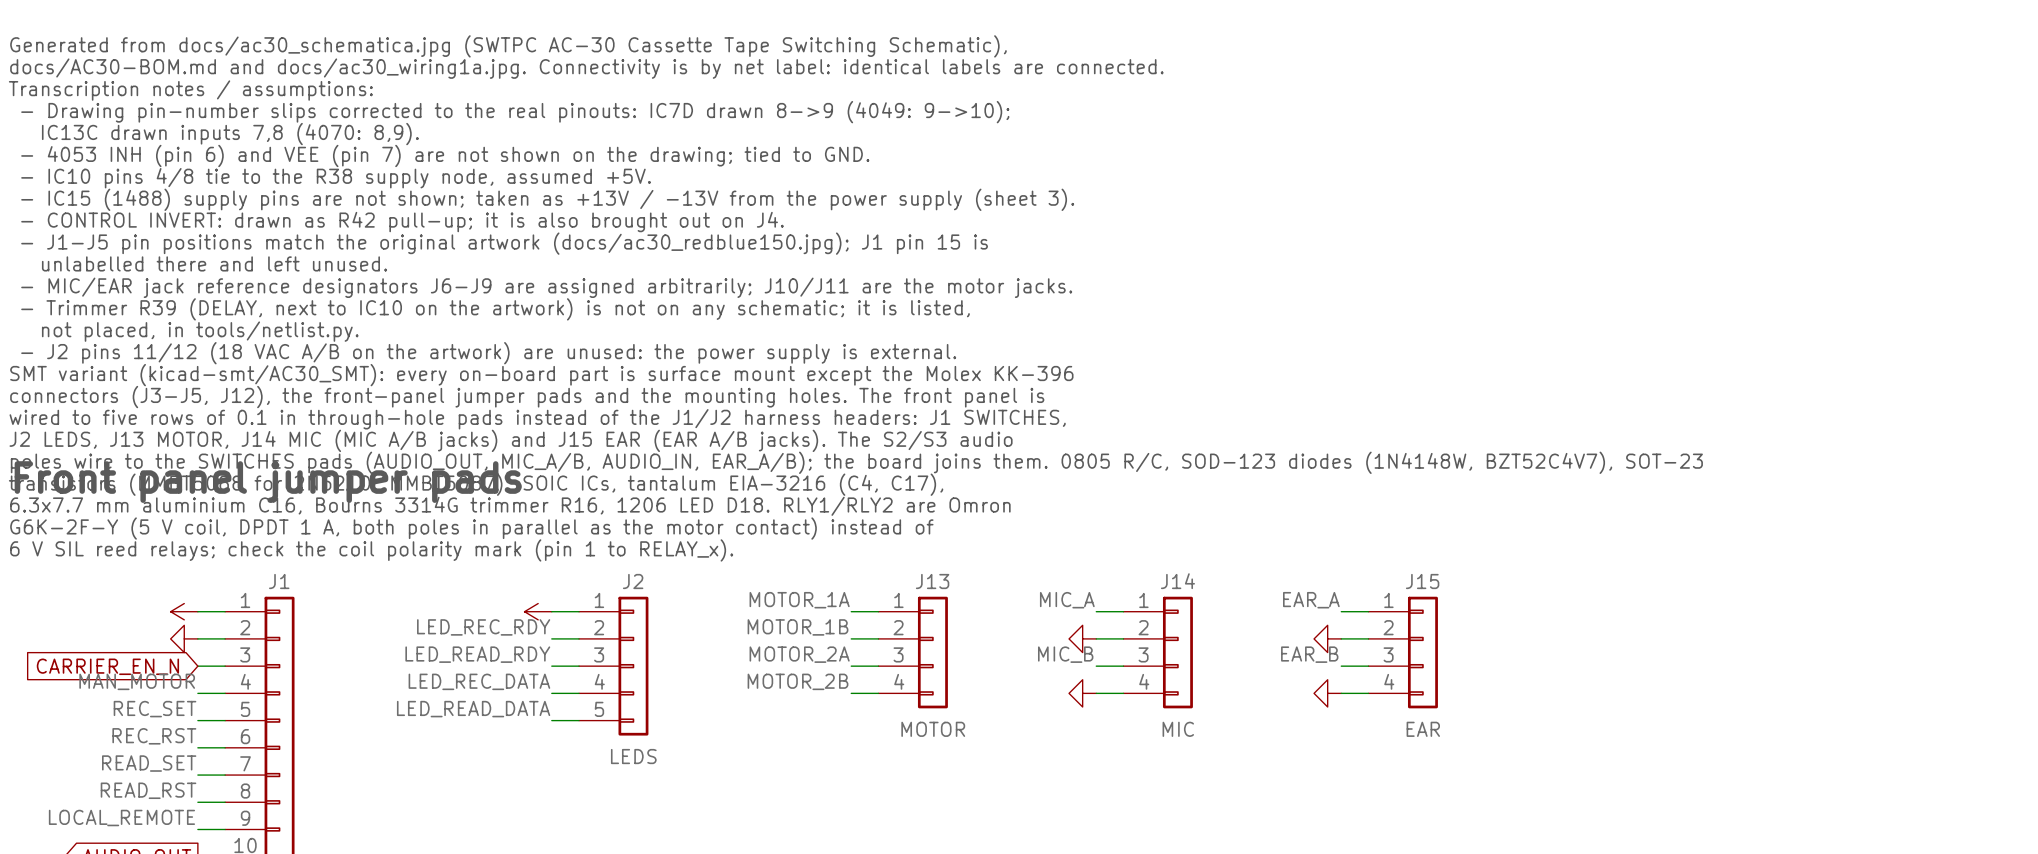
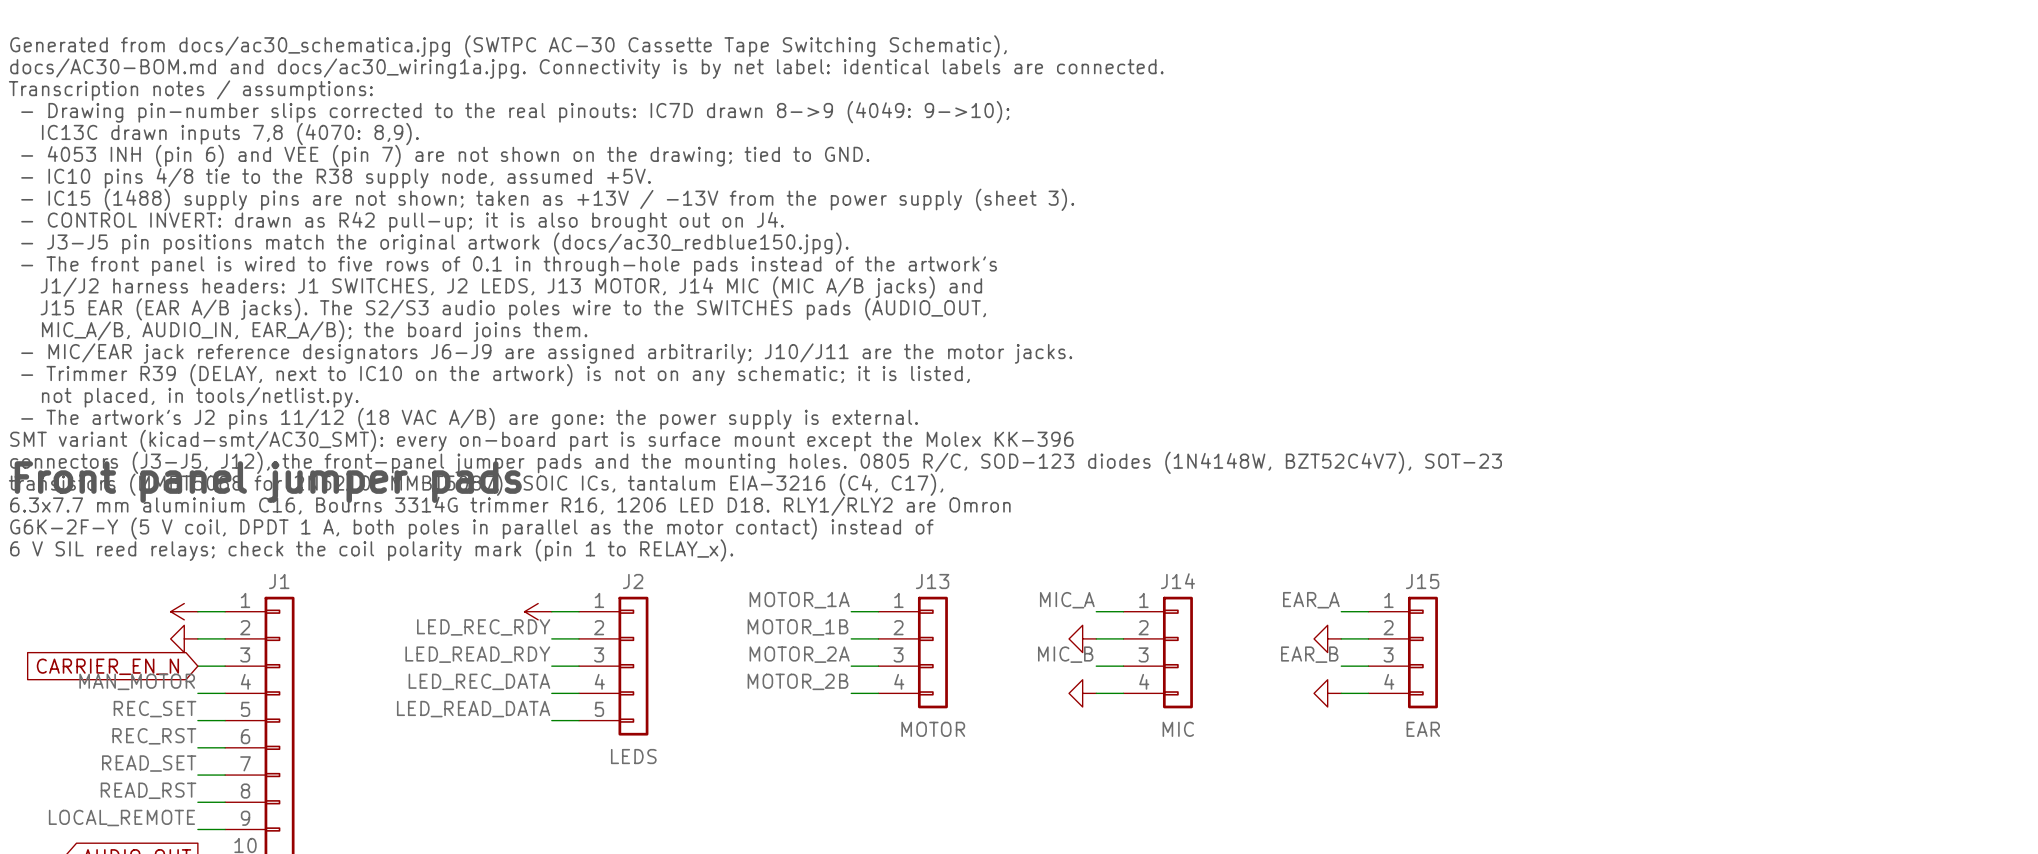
text: - J1-J5 pin positions match the original artwork (docs/ac30_redblue150.jpg); J1 pin 15 is (504, 243) -> - J3-J5 pin positions match the original artwork (docs/ac30_redblue150.jpg). (434, 243)
text: unlabelled there and left unused. (214, 263) -> - The front panel is wired to five rows of 0.1 in through-hole pads instead of the artwork's (509, 266)
text: - MIC/EAR jack reference designators J6-J9 are assigned arbitrarily; J10/J11 are the motor jacks. (546, 287) -> J1/J2 harness headers: J1 SWITCHES, J2 LEDS, J13 MOTOR, J14 MIC (MIC A/B jacks) and (511, 287)
text: - Trimmer R39 (DELAY, next to IC10 on the artwork) is not on any schematic; it is listed, (495, 309) -> J15 EAR (EAR A/B jacks). The S2/S3 audio poles wire to the SWITCHES pads (AUDIO_OUT, (513, 309)
text: not placed, in tools/netlist.py. (200, 331) -> MIC_A/B, AUDIO_IN, EAR_A/B); the board joins them. (314, 331)
text: - J2 pins 11/12 (18 VAC A/B on the artwork) are unused: the power supply is external. (488, 353) -> - MIC/EAR jack reference designators J6-J9 are assigned arbitrarily; J10/J11 are the motor jacks. (546, 353)
text: SMT variant (kicad-smt/AC30_SMT): every on-board part is surface mount except the Molex KK-396 (541, 375) -> - Trimmer R39 (DELAY, next to IC10 on the artwork) is not on any schematic; it is listed, (495, 375)
text: connectors (J3-J5, J12), the front-panel jumper pads and the mounting holes. The front panel is (527, 397) -> not placed, in tools/netlist.py. (200, 397)
text: wired to five rows of 0.1 in through-hole pads instead of the J1/J2 harness headers: J1 SWITCHES, (537, 419) -> - The artwork's J2 pins 11/12 (18 VAC A/B) are gone: the power supply is external. (469, 418)
text: J2 LEDS, J13 MOTOR, J14 MIC (MIC A/B jacks) and J15 EAR (EAR A/B jacks). The S2/S3 audio (511, 440) -> SMT variant (kicad-smt/AC30_SMT): every on-board part is surface mount except the Molex KK-396 (541, 440)
text: poles wire to the SWITCHES pads (AUDIO_OUT, MIC_A/B, AUDIO_IN, EAR_A/B); the board joins them. 0805 R/C, SOD-123 diodes (1N4148W, BZT52C4V7), SOT-23 (856, 462) -> connectors (J3-J5, J12), the front-panel jumper pads and the mounting holes. 0805 R/C, SOD-123 diodes (1N4148W, BZT52C4V7), SOT-23 (756, 462)

